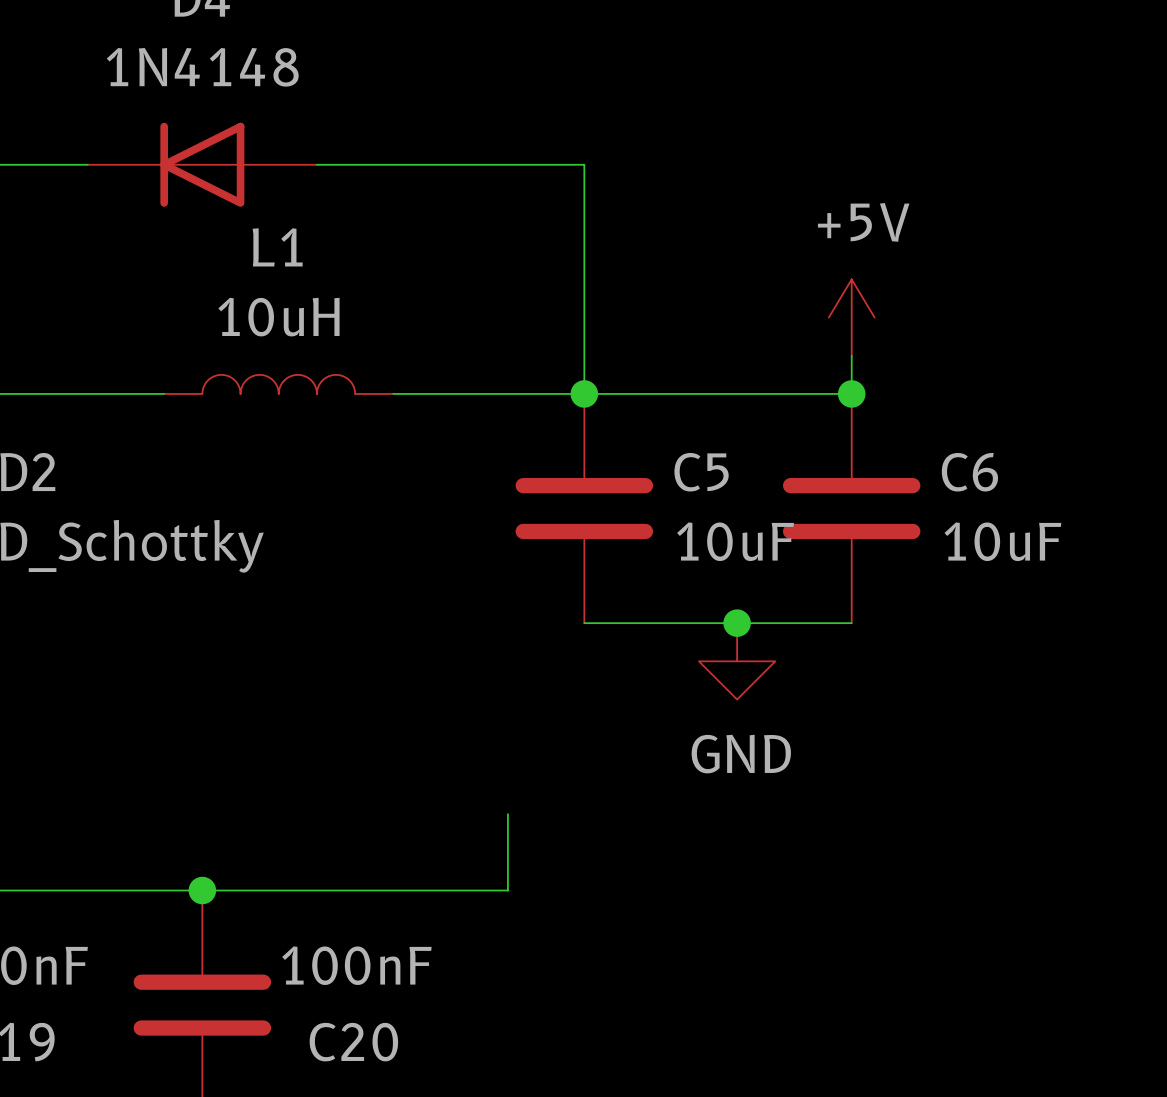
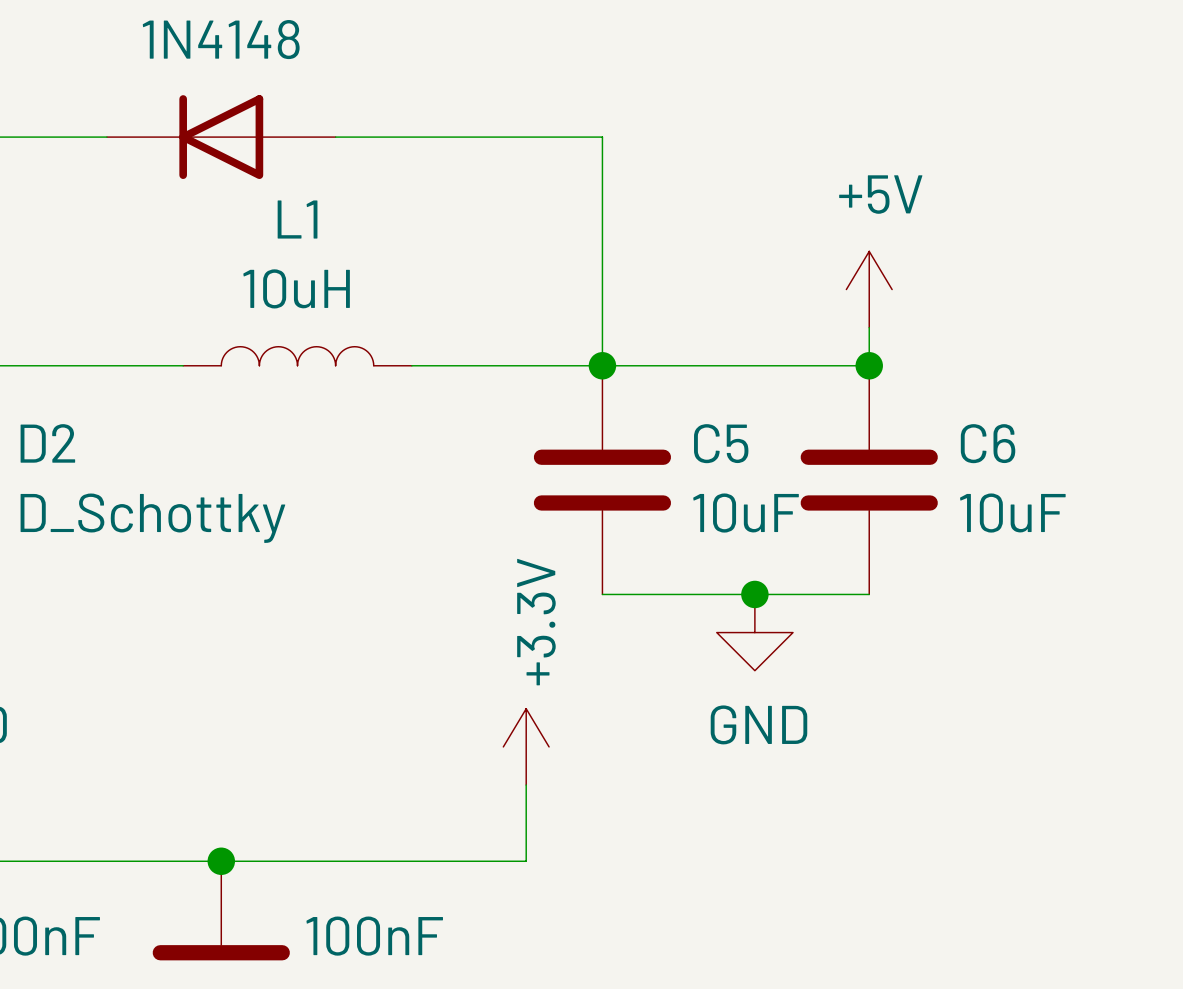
power symbol: none -> +3.3V (526, 746)

